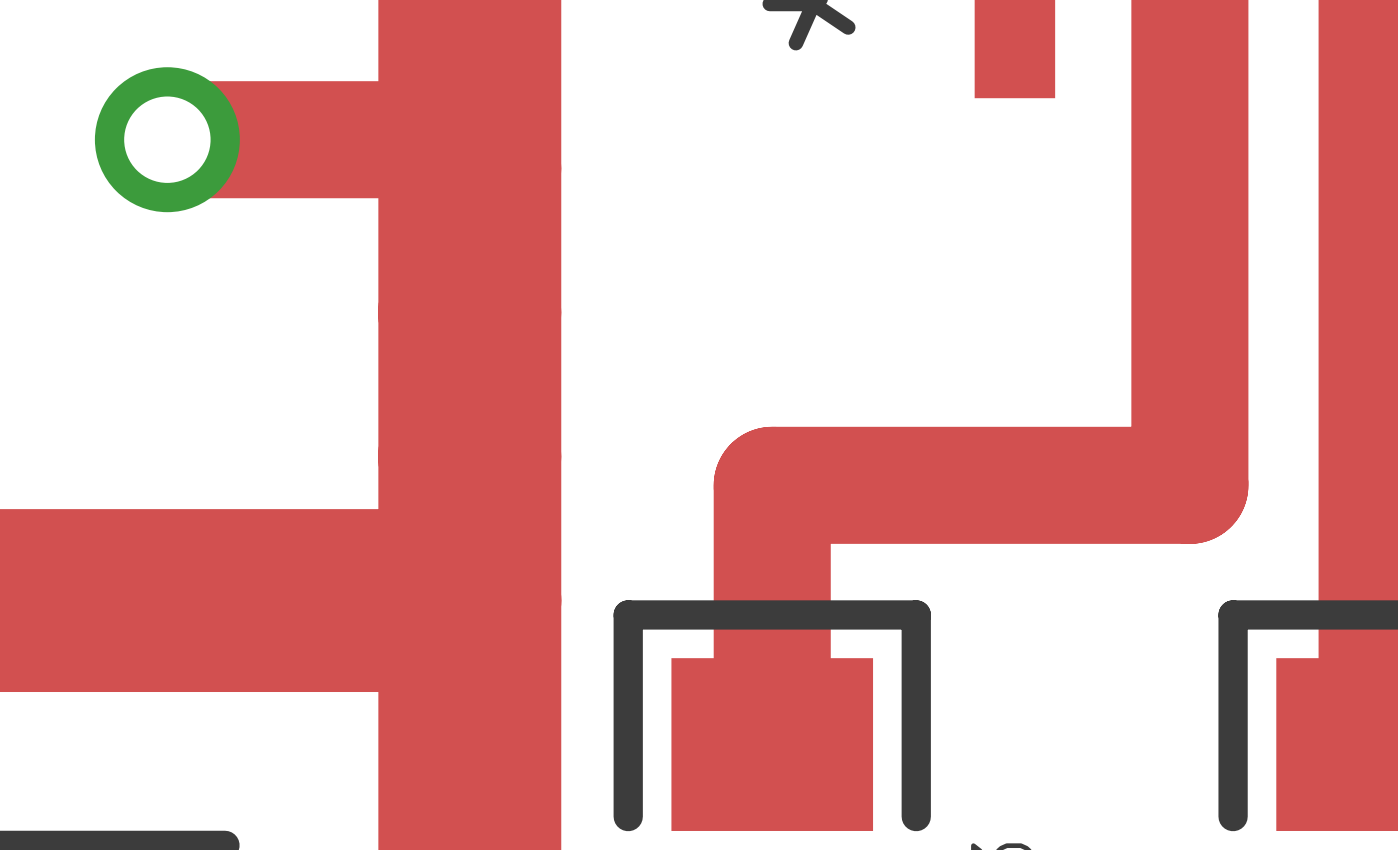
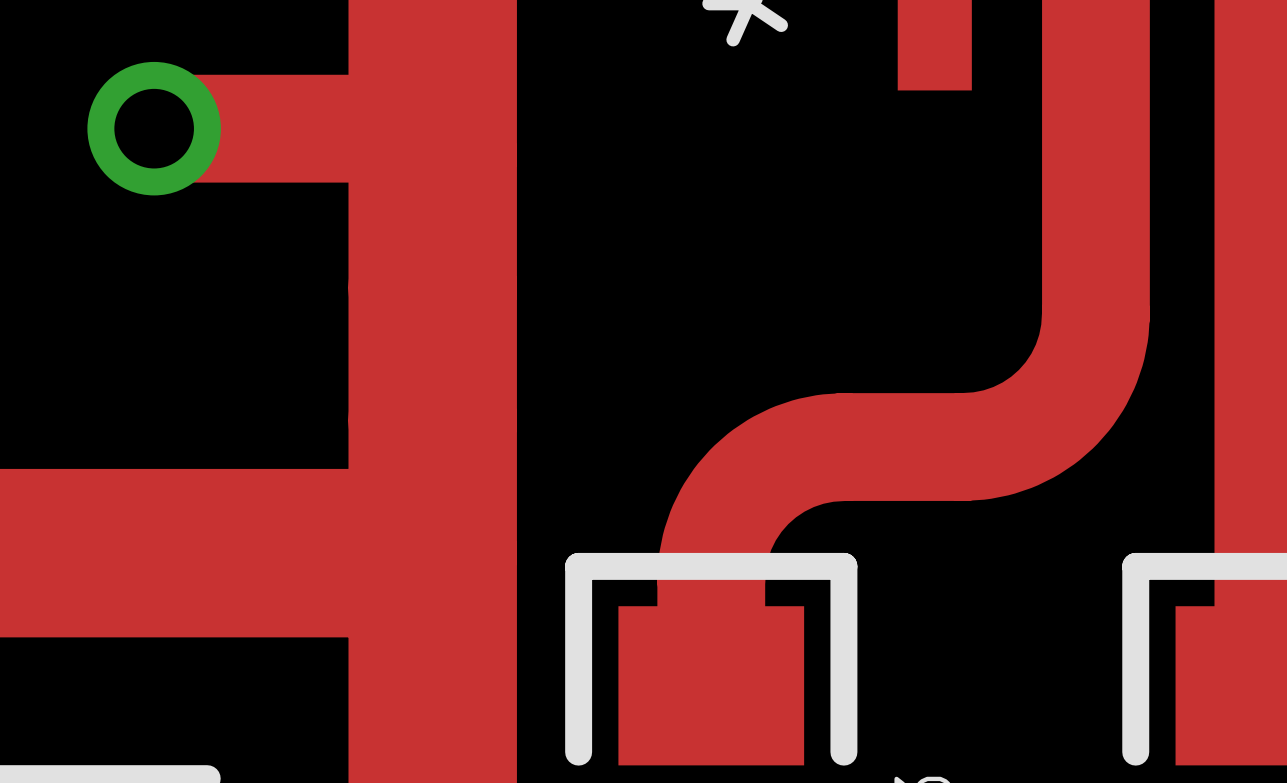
track: (1189, 341) (1189, 485) (1045, 485) -> (1095, 314) (1091, 348) (1085, 365) (1078, 380) (1057, 408) (1044, 419) (1014, 436) (997, 442) (963, 447)
track: (916, 485) (772, 485) (772, 629) -> (843, 447) (809, 451) (793, 457) (763, 474) (750, 485) (729, 513) (721, 528) (715, 545) (711, 579)

